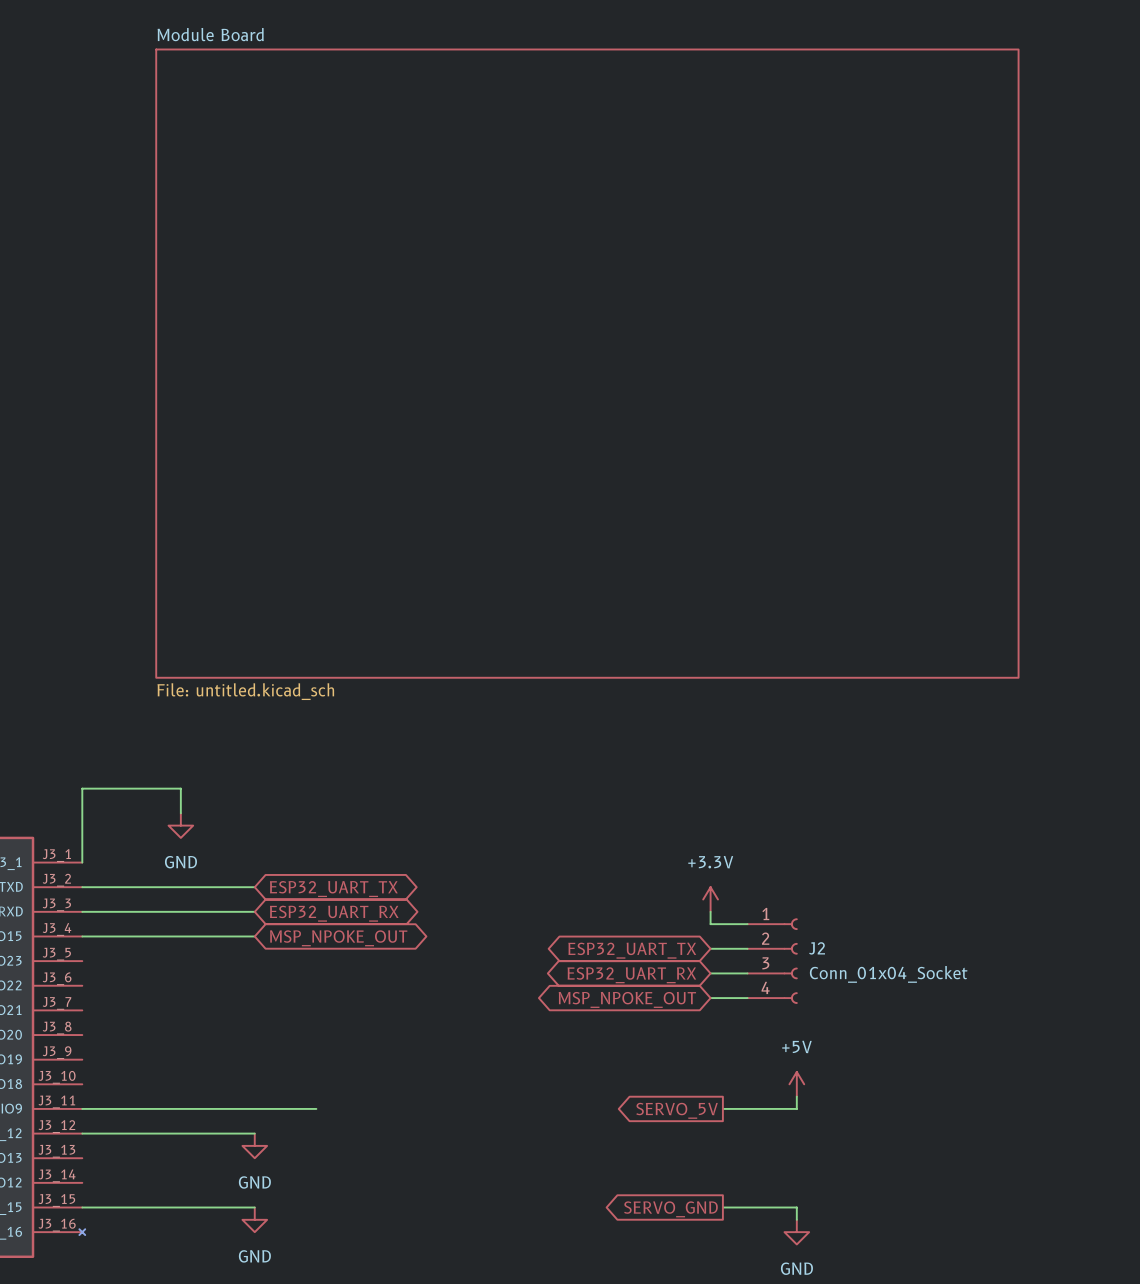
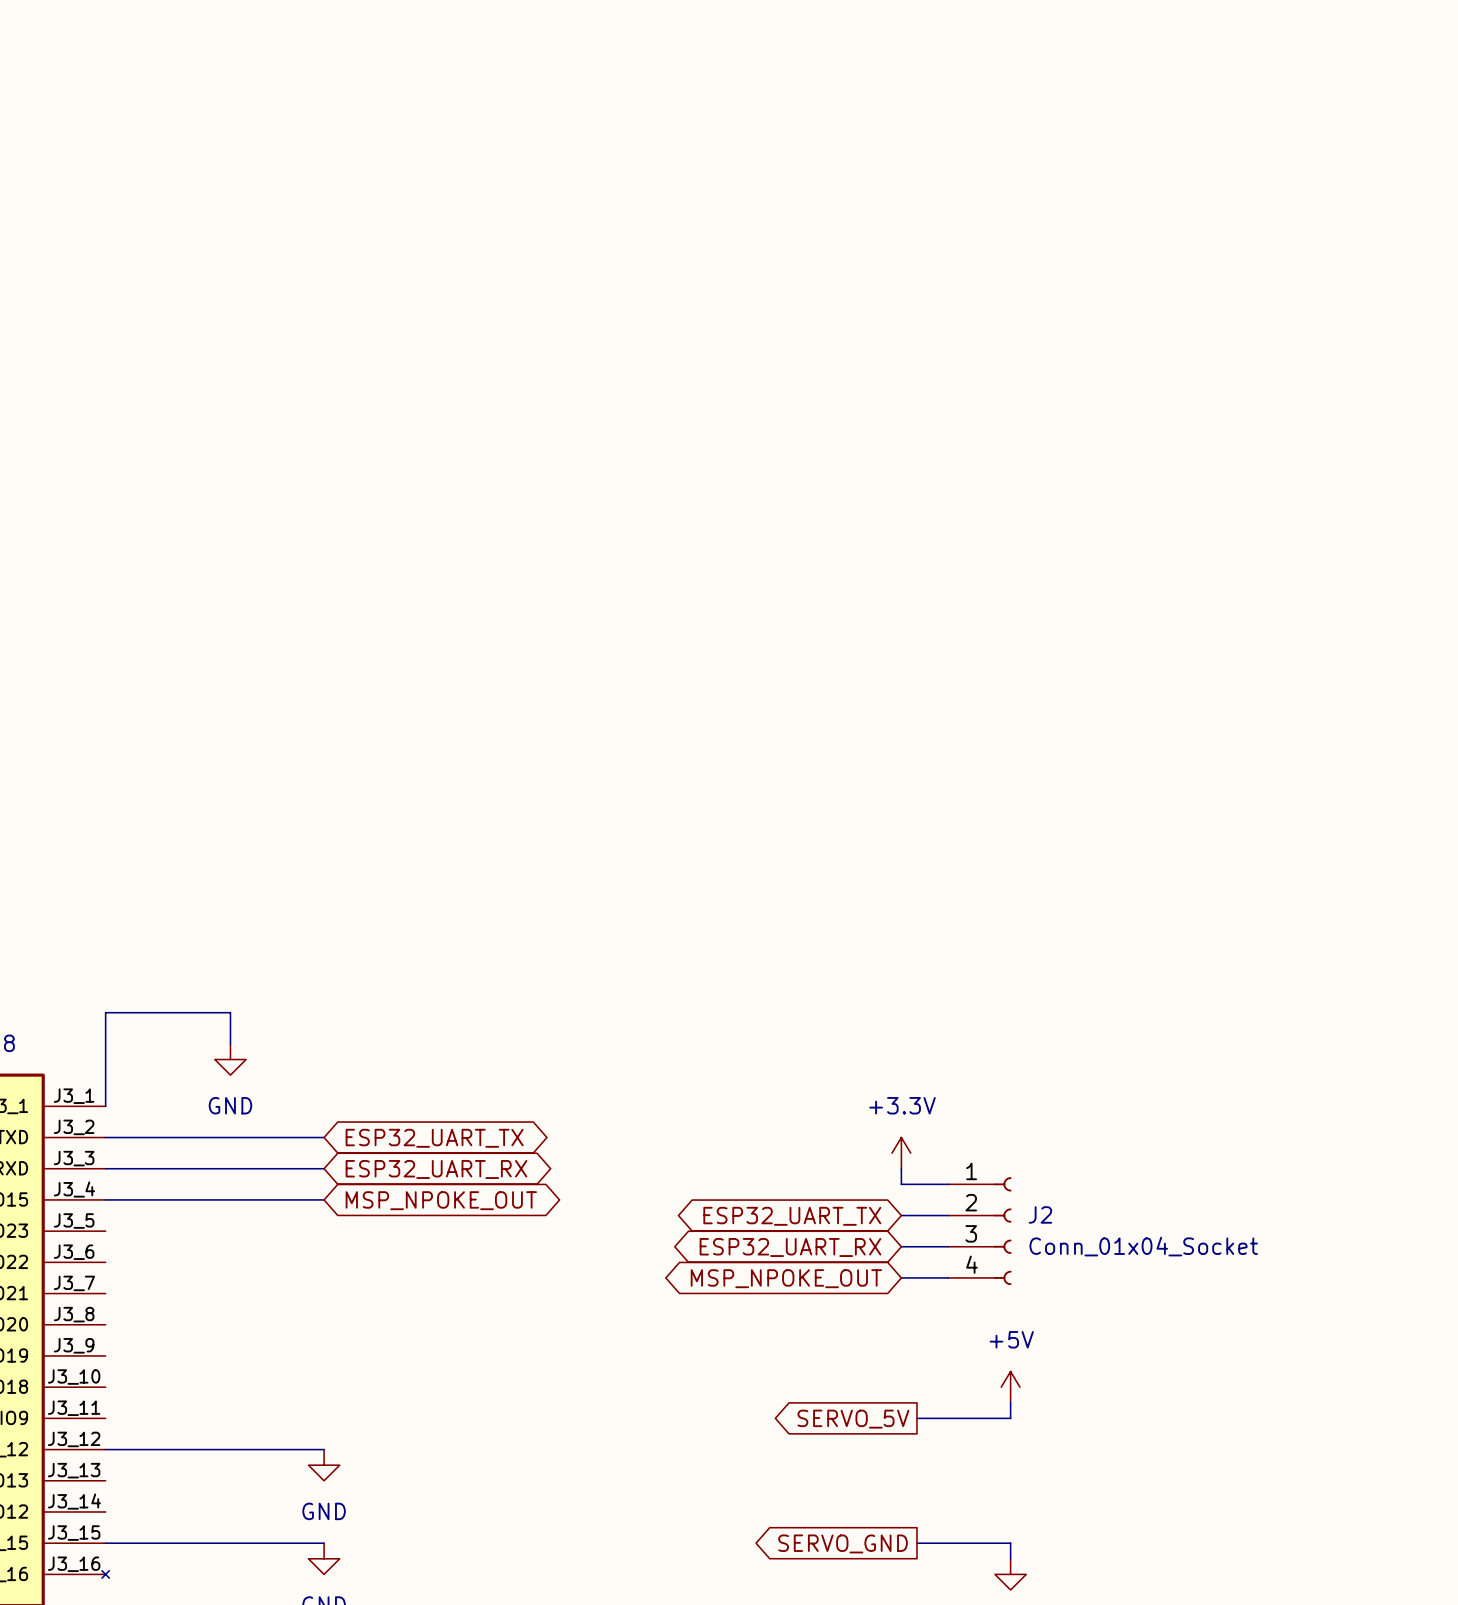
sheet Module Board: File: untitled.kicad_sch (587, 363) -> none
wire: (82, 1108) (316, 1108) -> none

